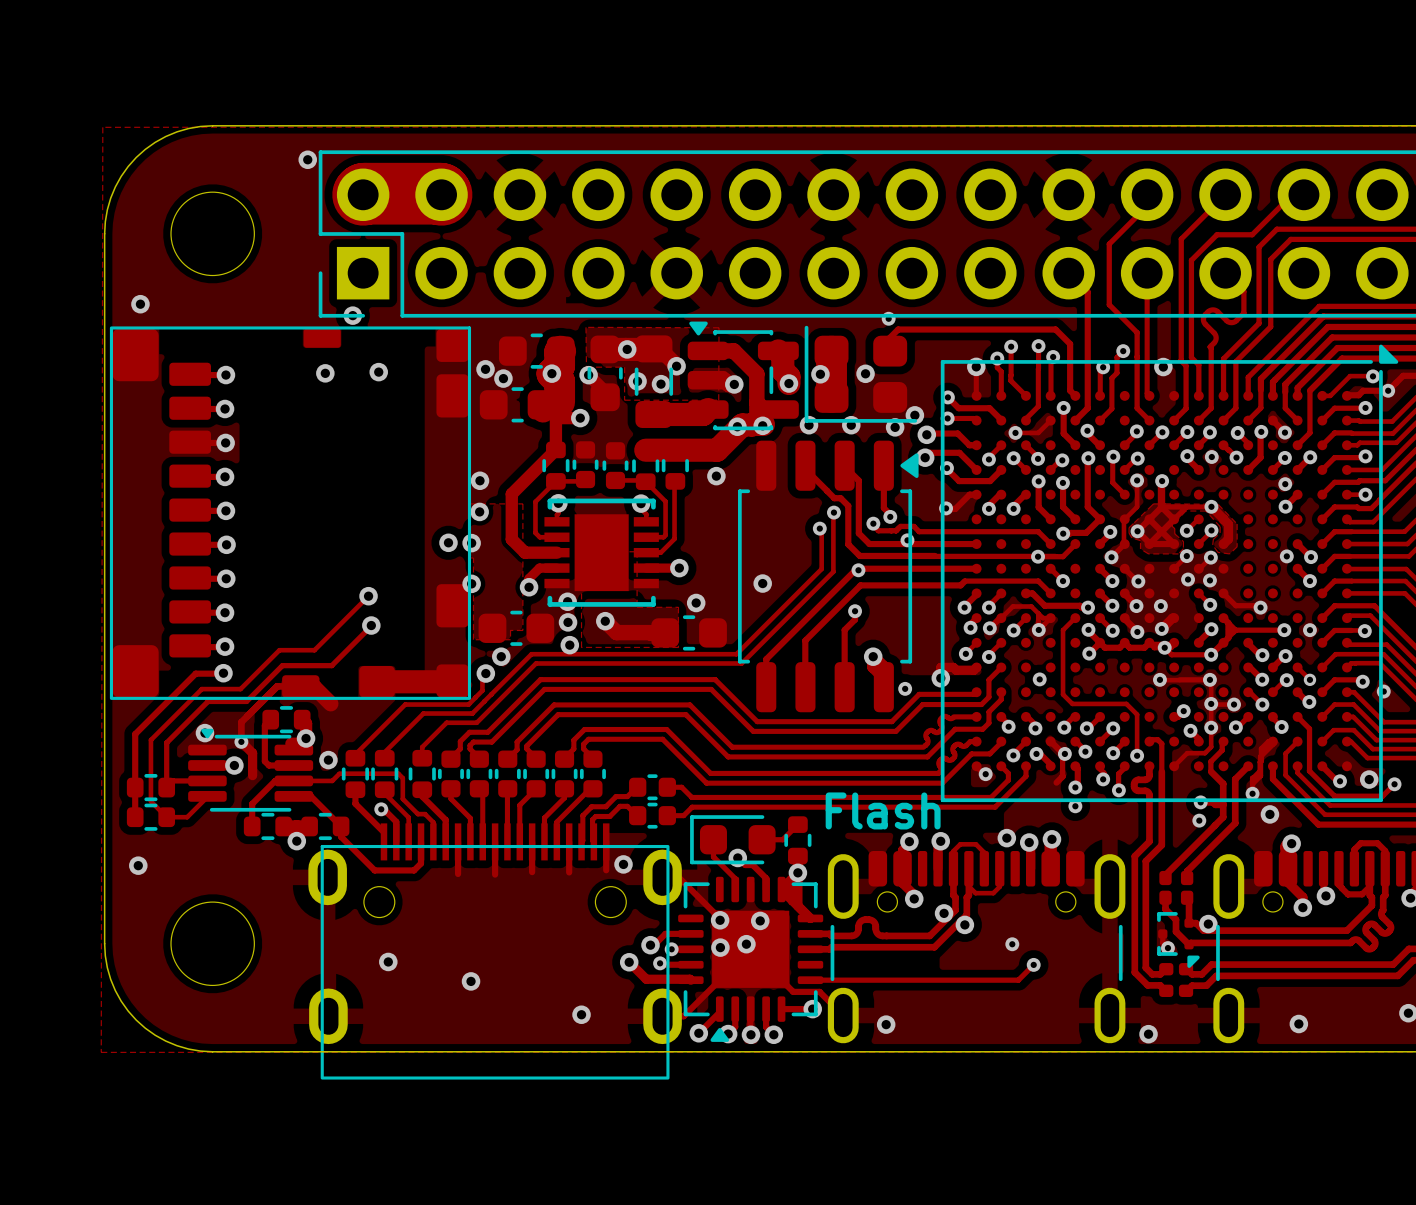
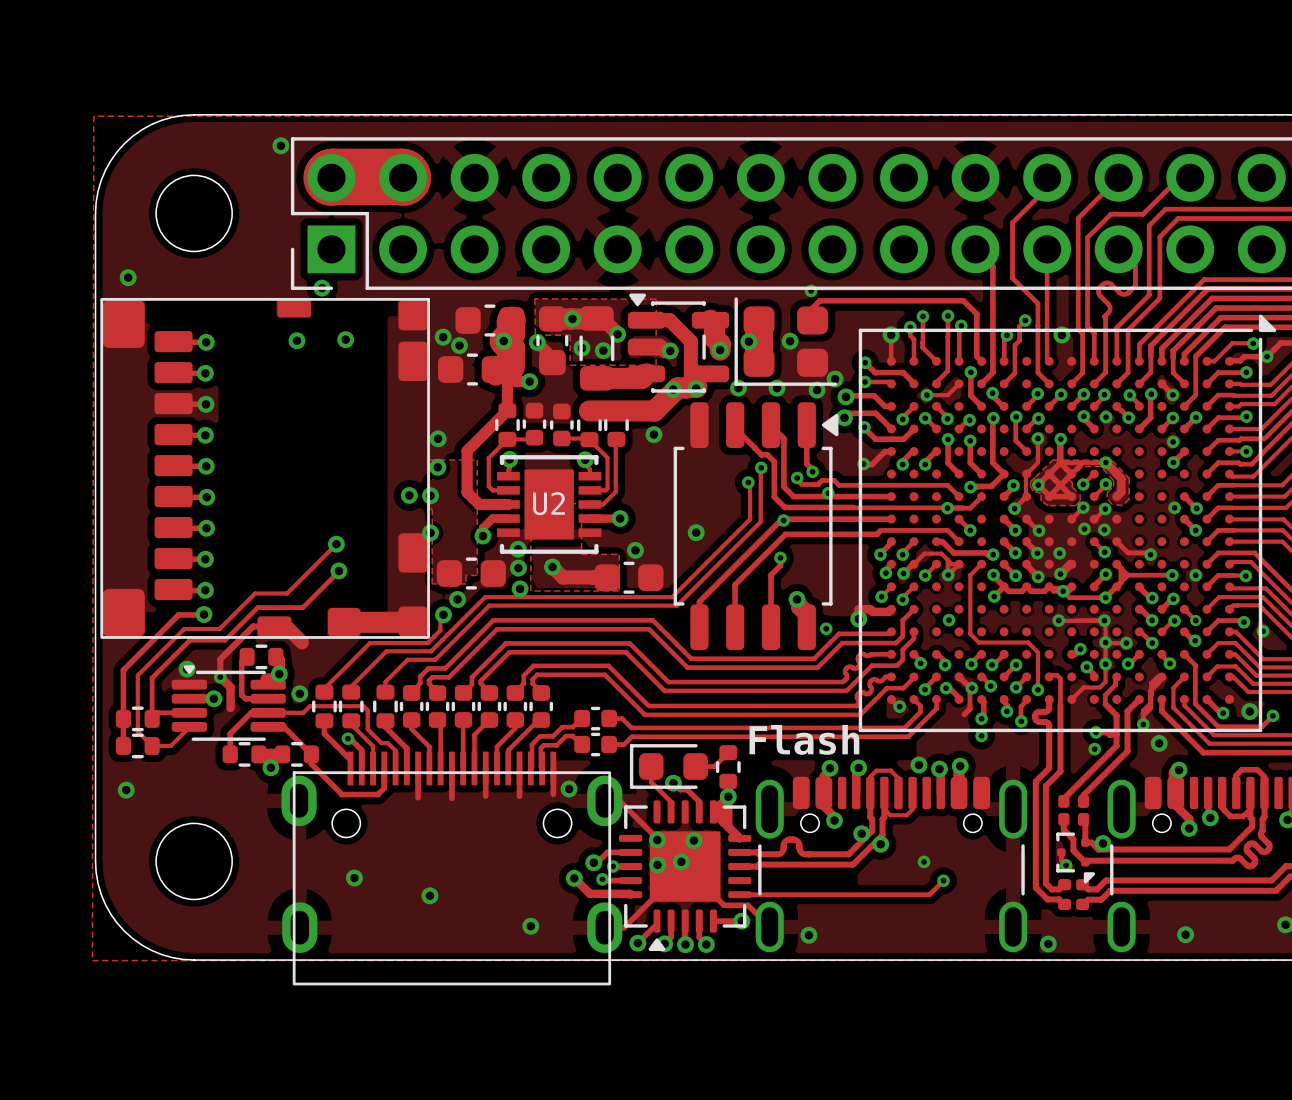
U2 name: none -> U2 (548, 503)

